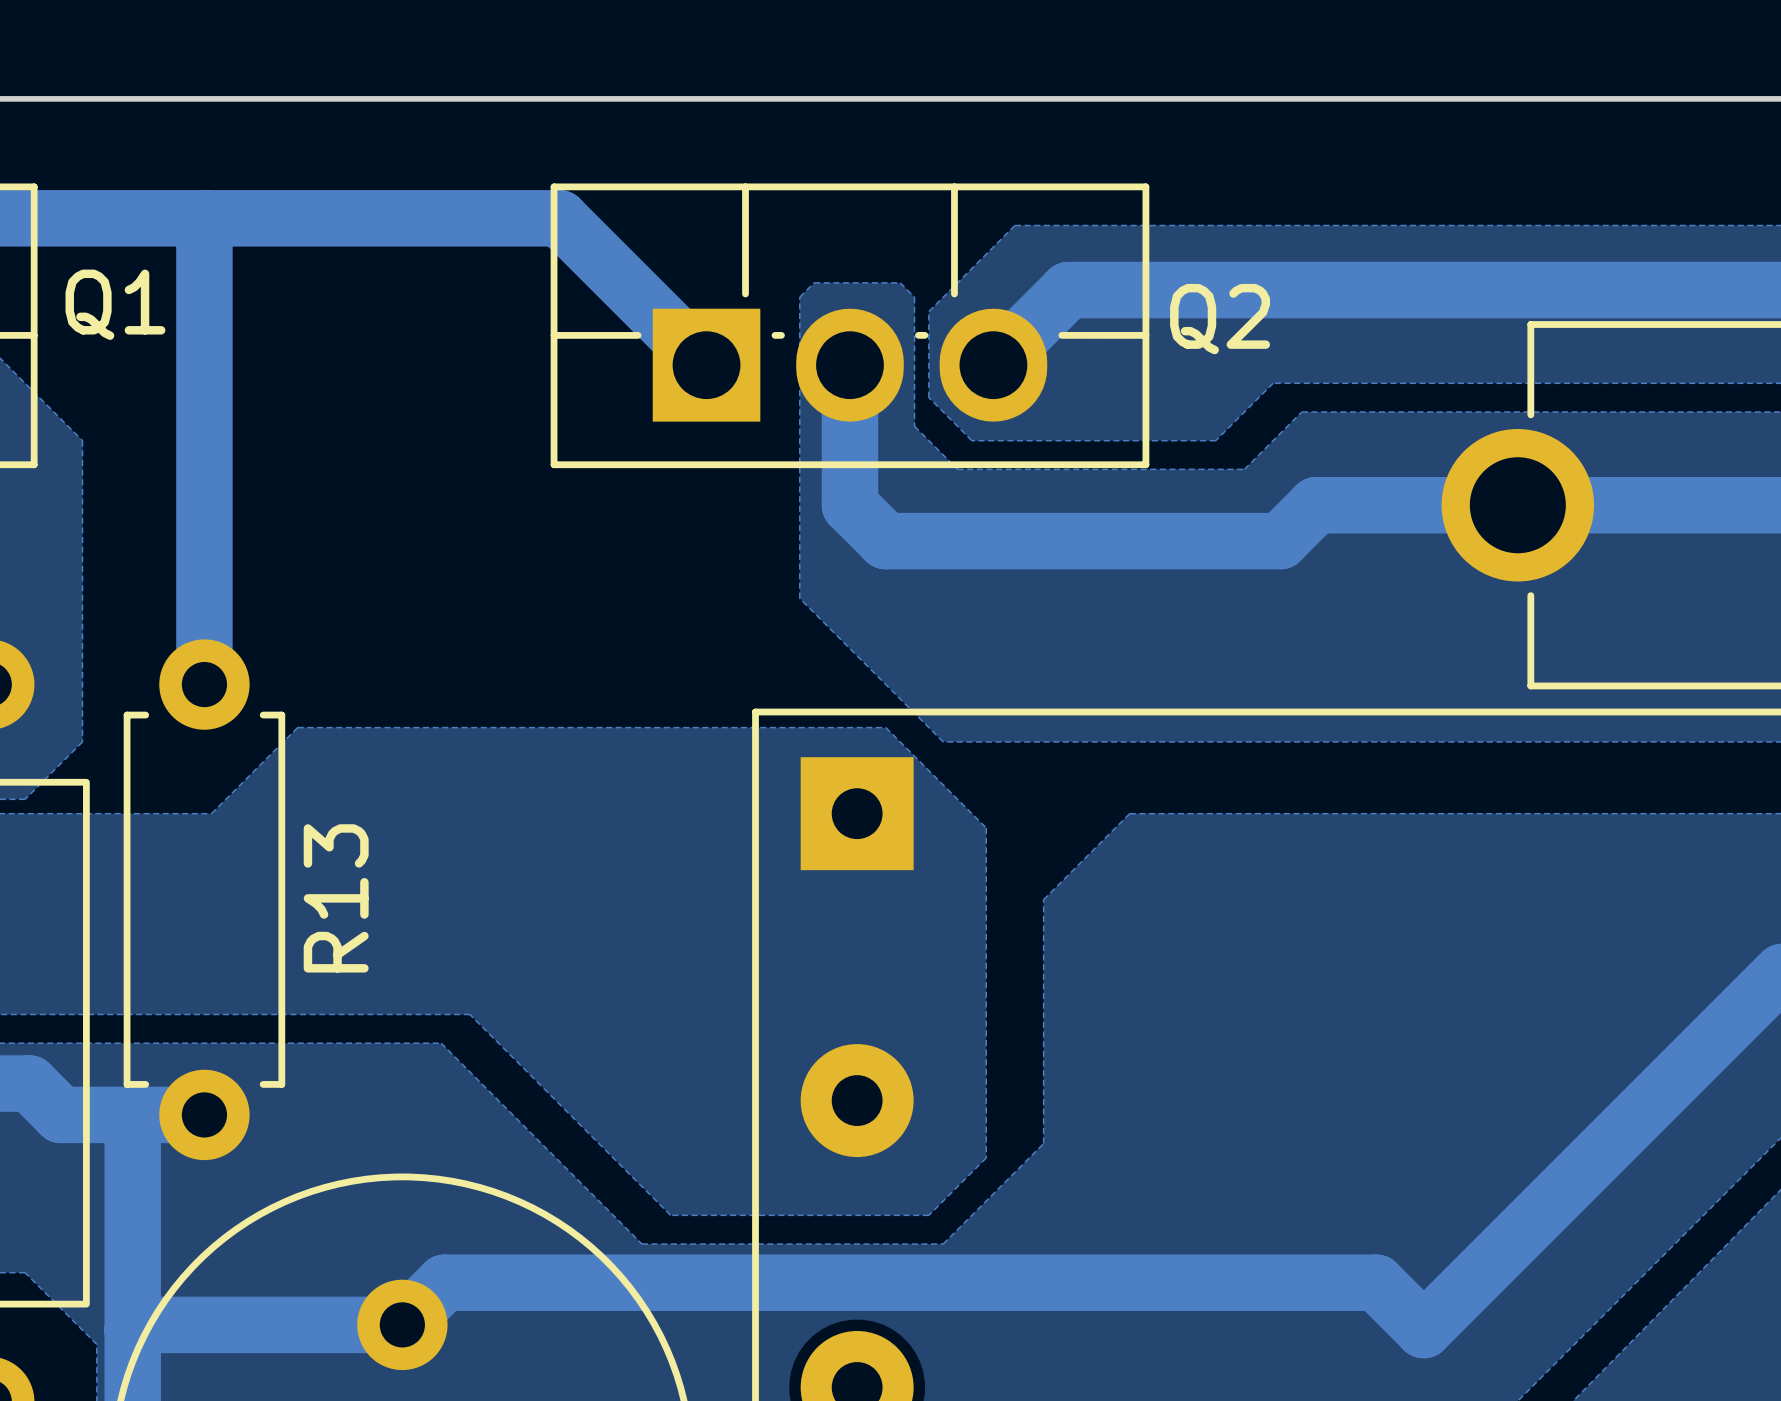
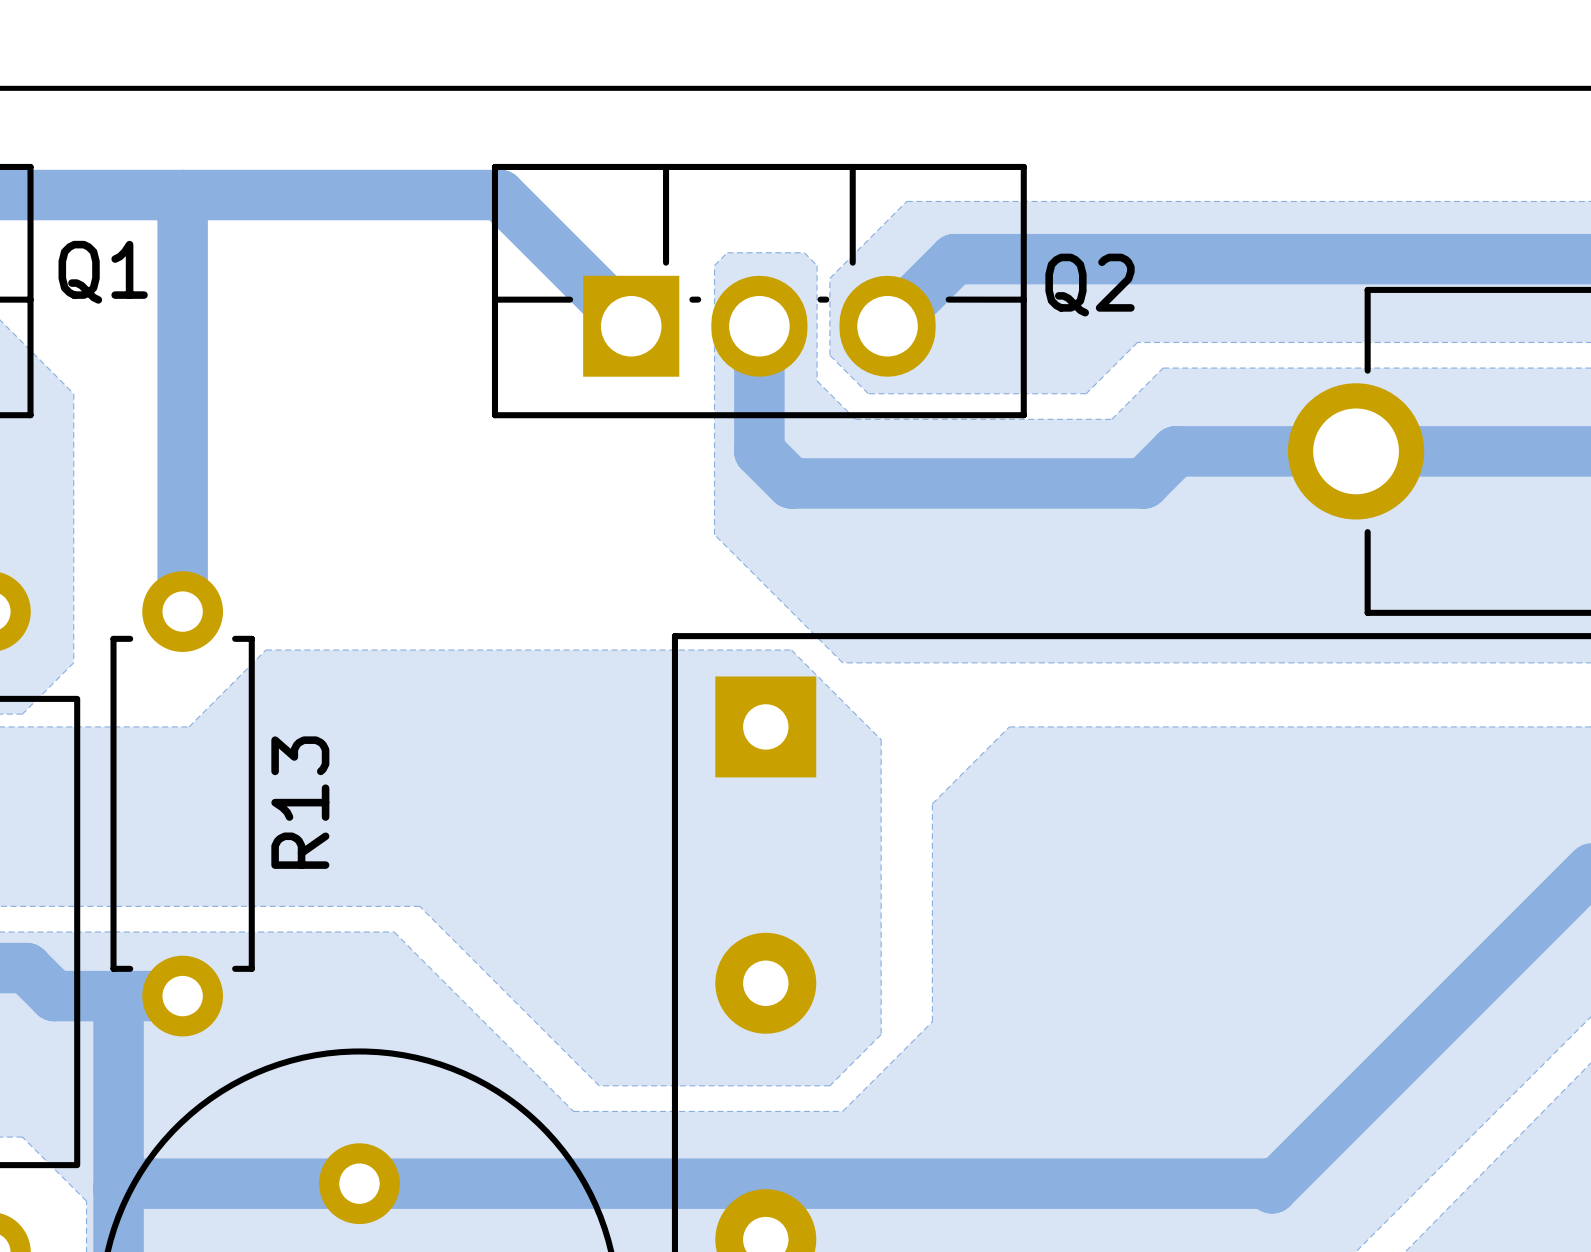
bottom track: (402, 1324) (444, 1282) (1376, 1282) (1418, 1324) -> (359, 1183) (1267, 1183)

